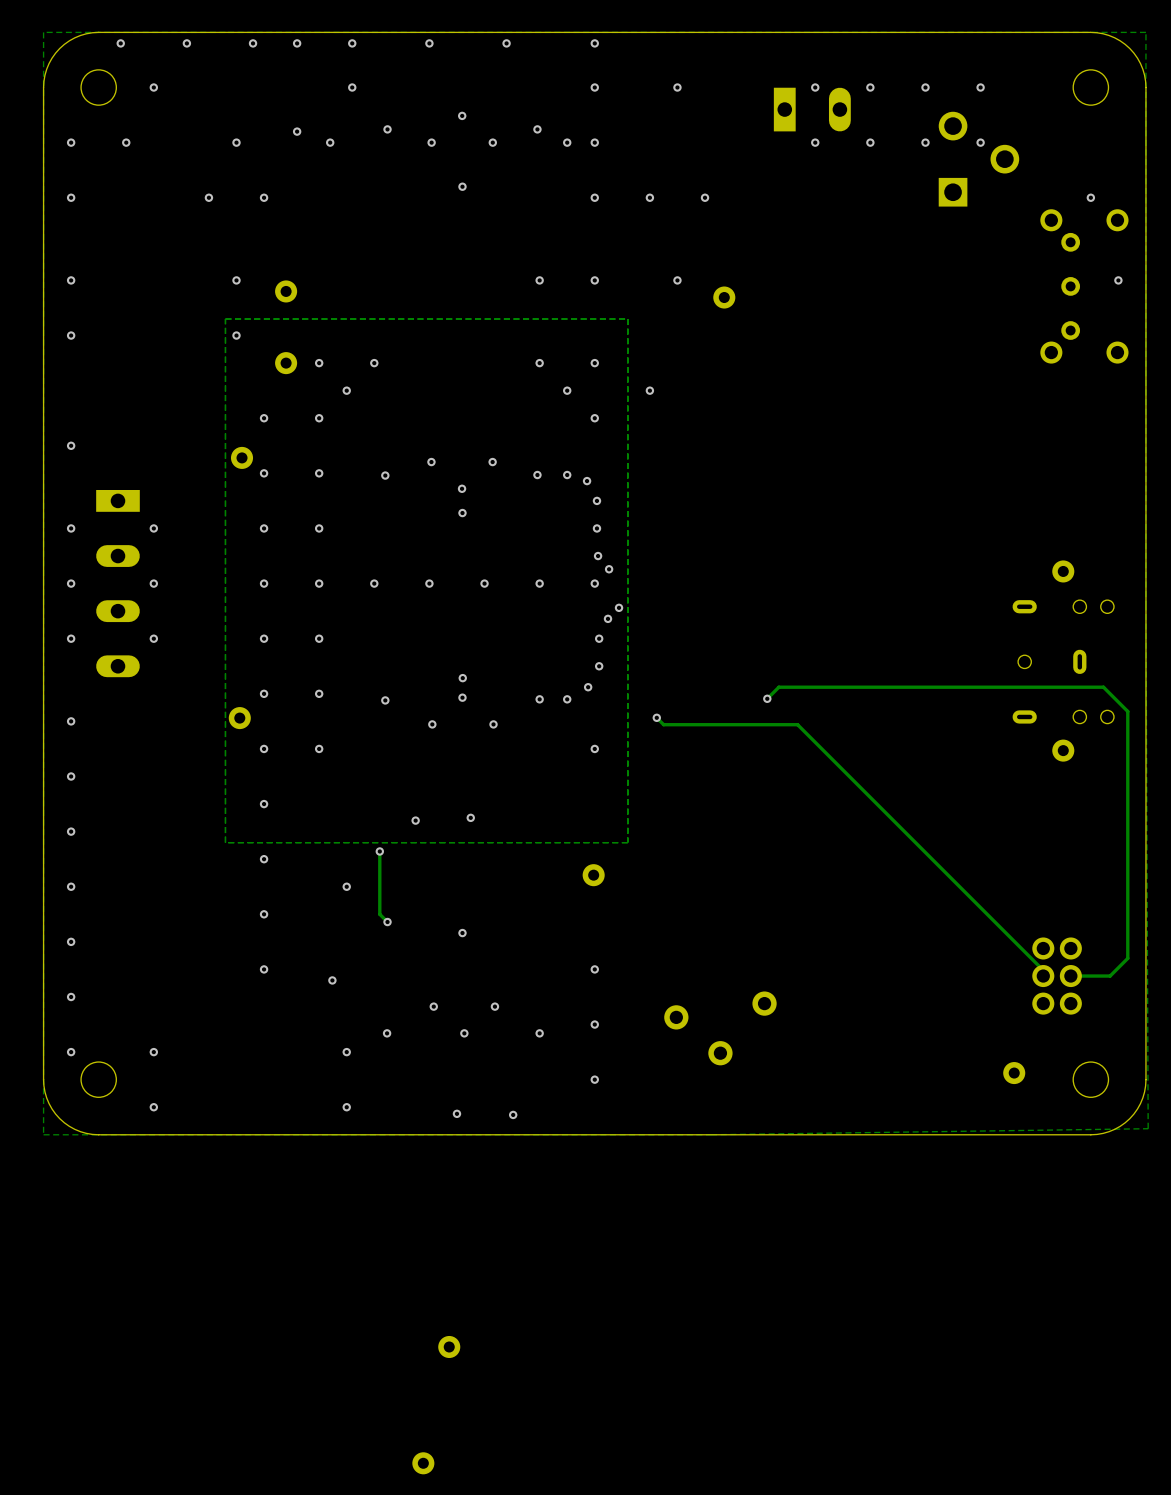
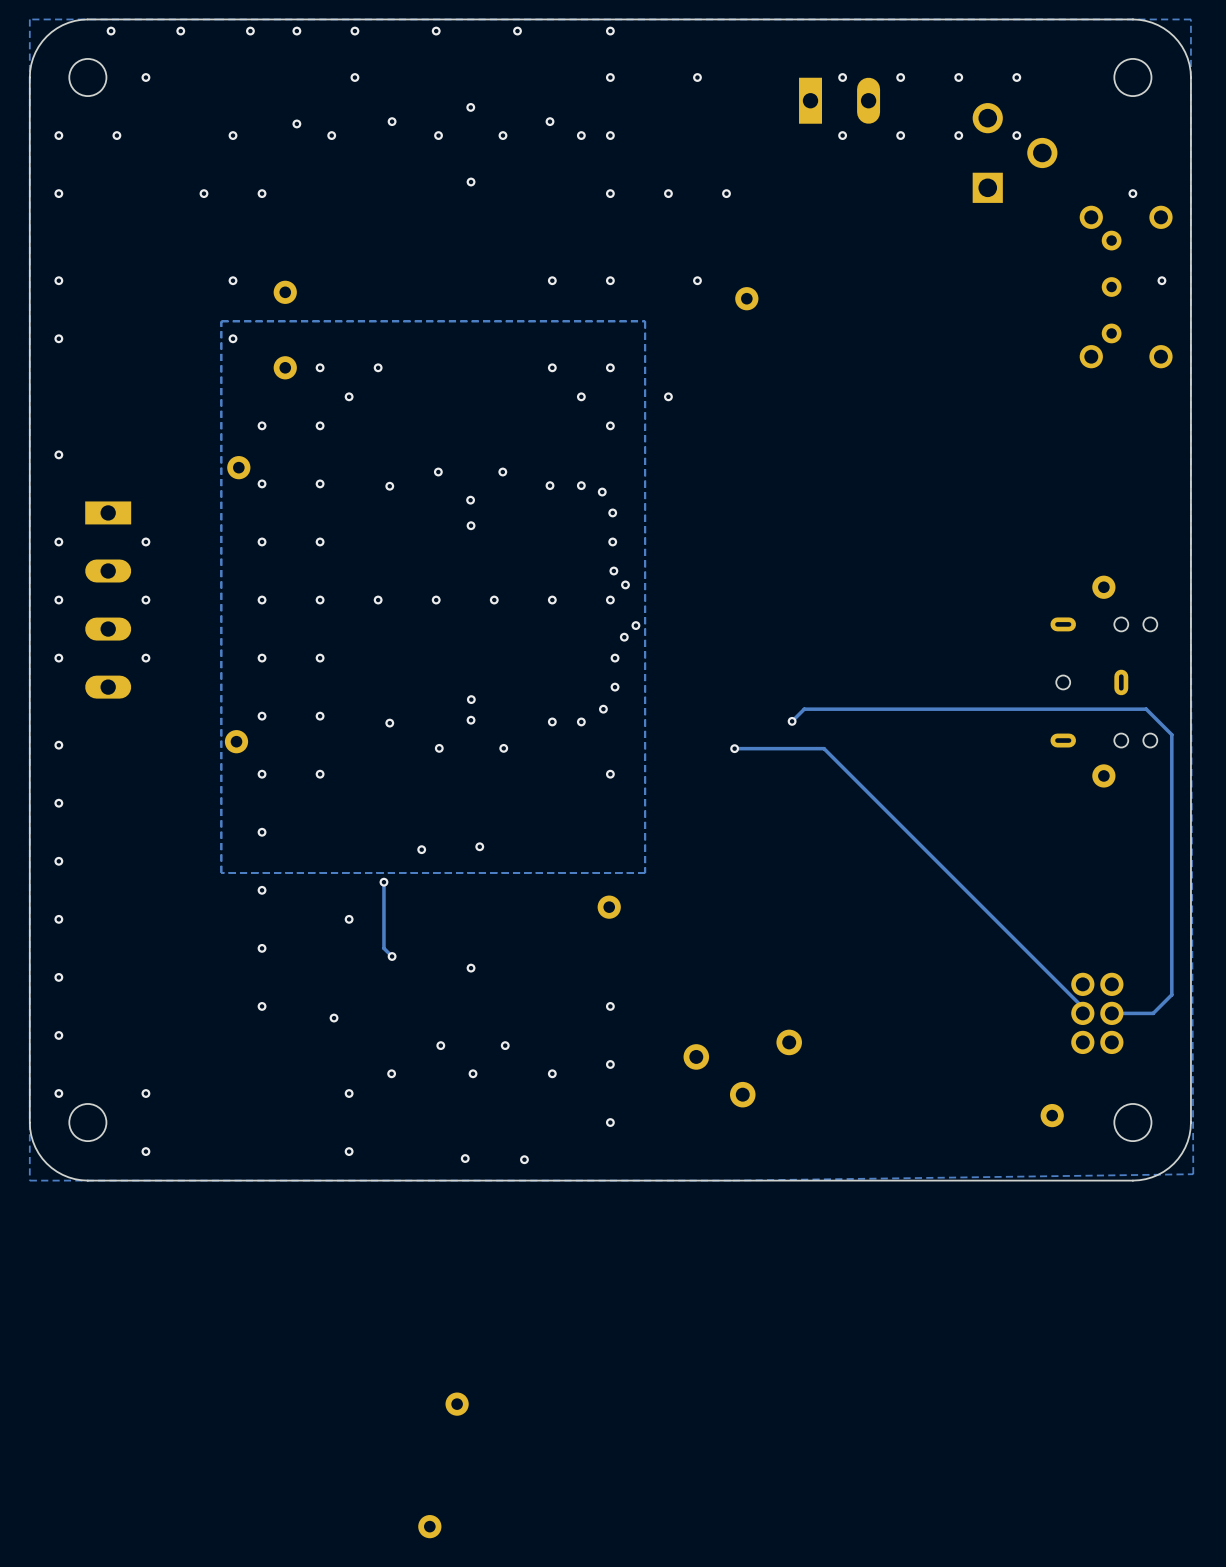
track: (656, 717) (663, 724) (712, 724) -> none
via position: (656, 717) -> (734, 748)

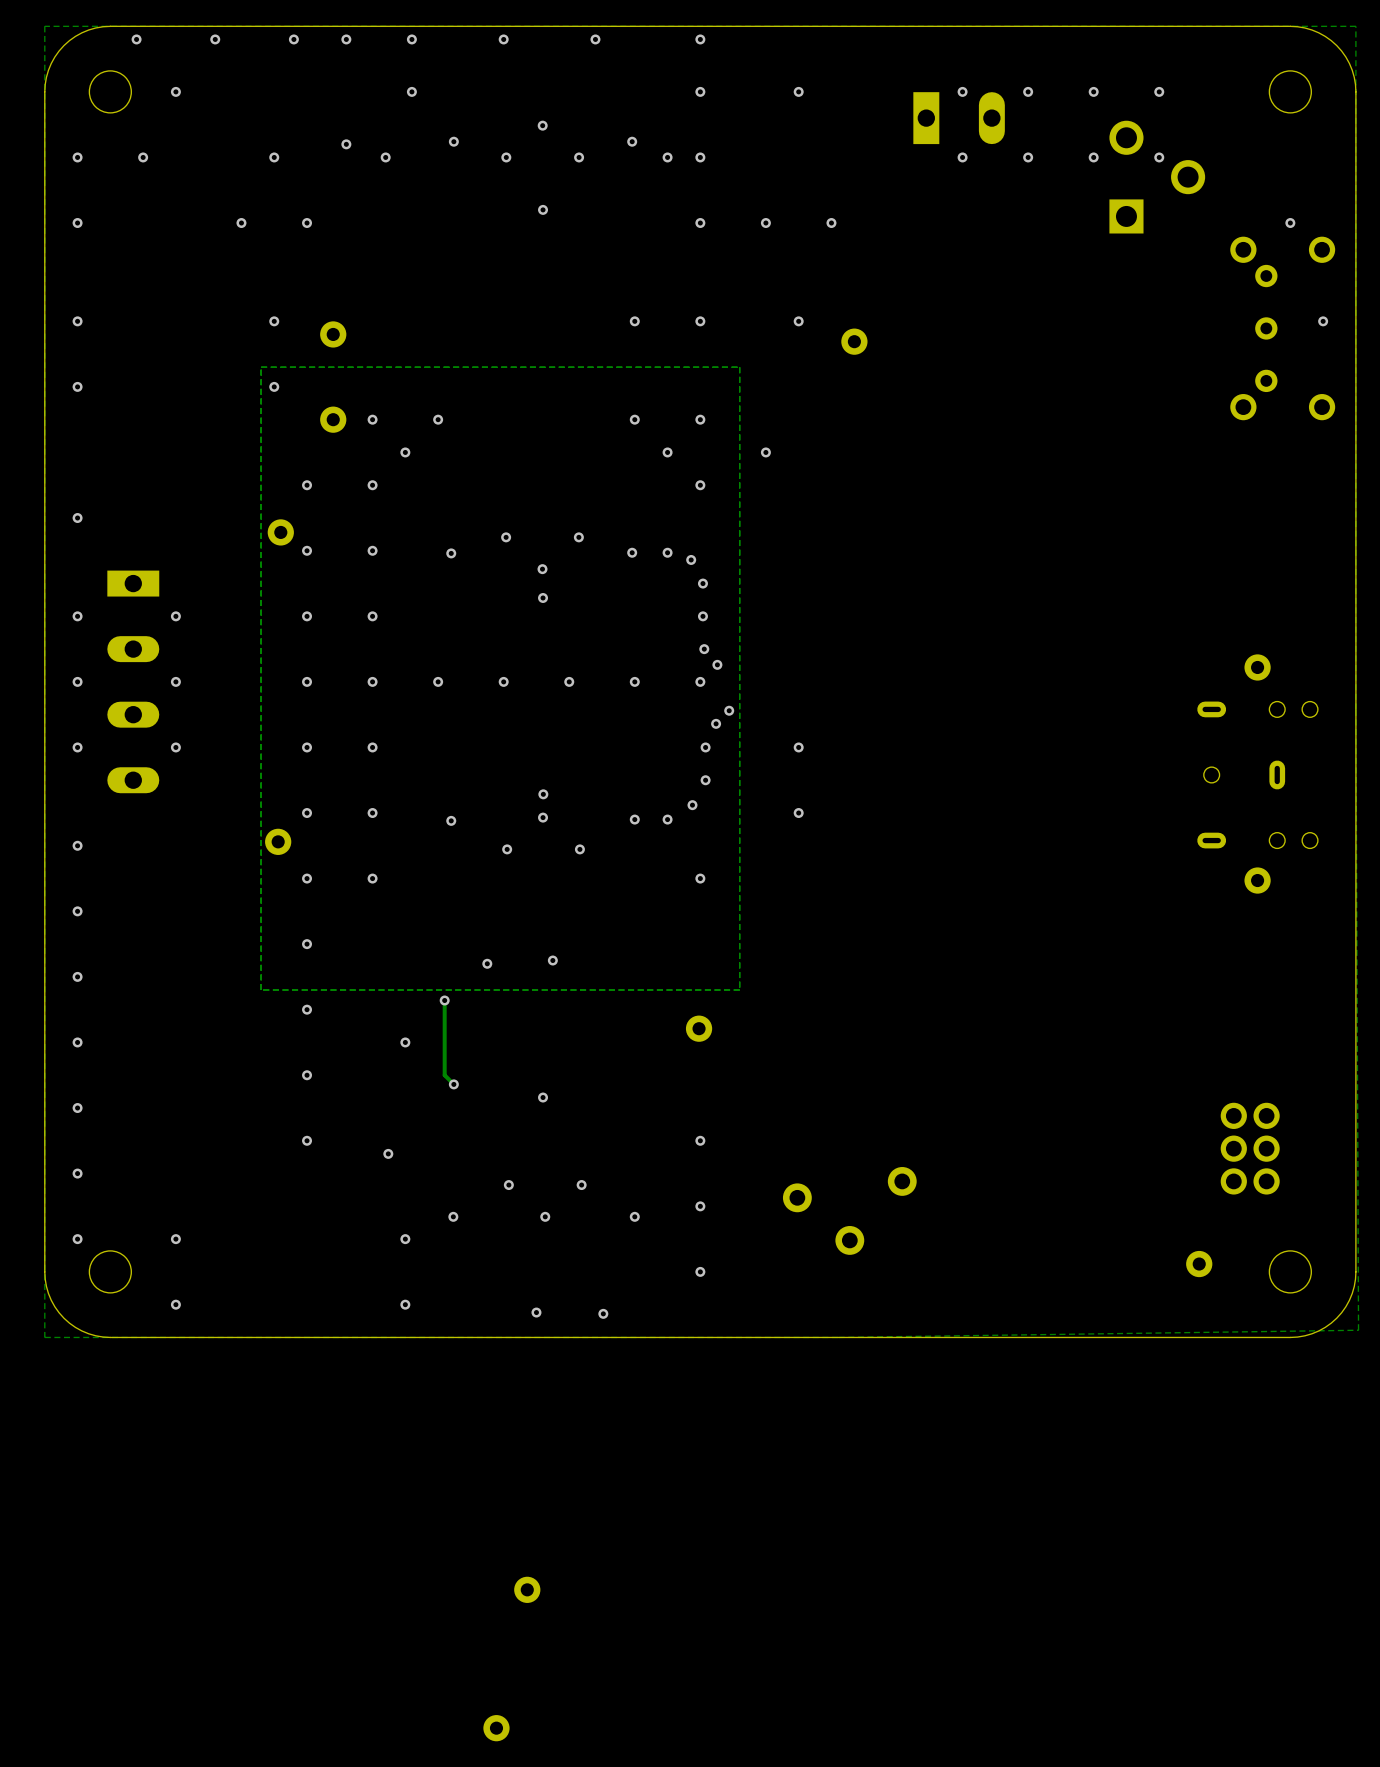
via: none -> (798, 747)
via: none -> (798, 813)
track: (792, 721) (804, 709) (1146, 709) (1171, 734) (1171, 994) (1153, 1013) (1111, 1013) -> none
via: (792, 721) -> none
track: (734, 748) (824, 748) (1082, 1007) (1082, 1013) -> none
via: (734, 748) -> none

